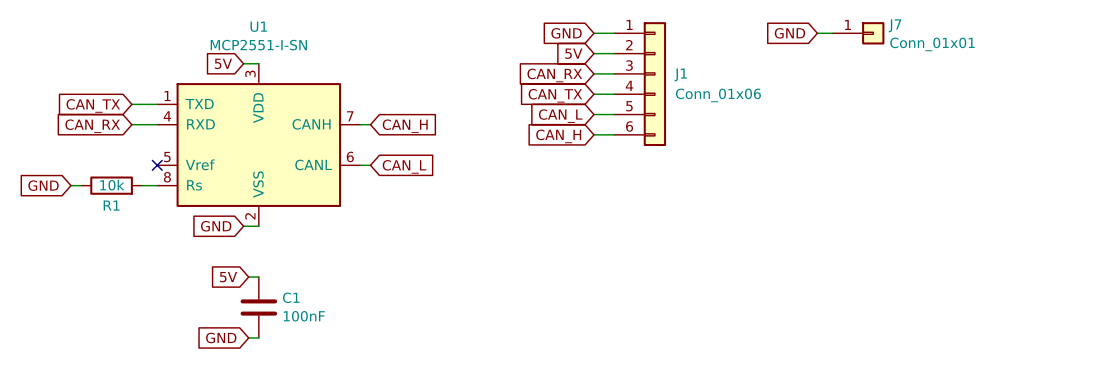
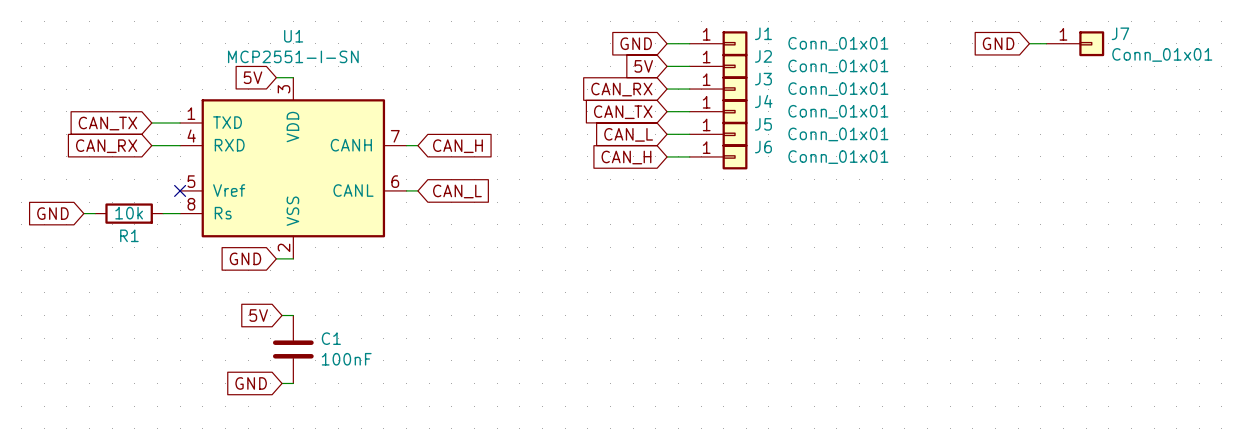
J1 symbol: [614, 22, 667, 147] -> [689, 31, 748, 57]
global label position: GND (789, 33) -> GND (998, 43)
wire: (817, 33) (832, 33) -> (1029, 43) (1046, 43)
J7 position: (858, 33) -> (1075, 43)
J2: none -> Conn_01x01 (718, 66)
J3: none -> Conn_01x01 (718, 89)
J4: none -> Conn_01x01 (718, 111)
J1 value: Conn_01x06 (718, 95) -> Conn_01x01 (838, 43)
J5: none -> Conn_01x01 (718, 134)
J6: none -> Conn_01x01 (718, 156)

